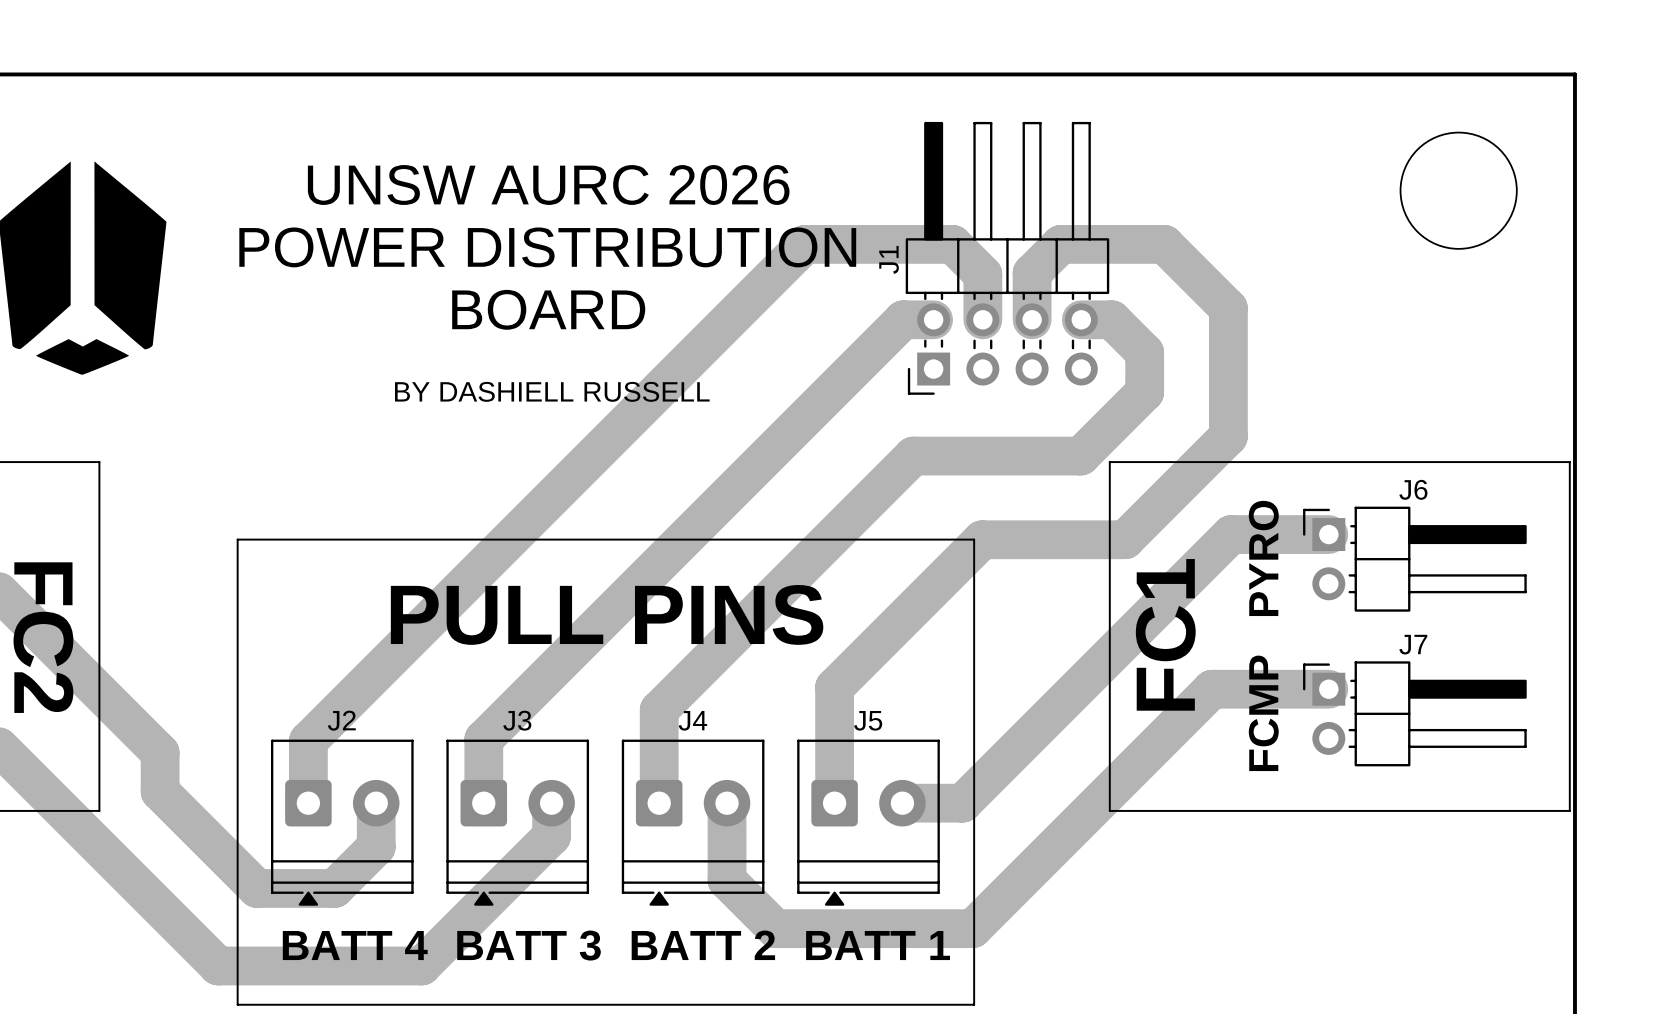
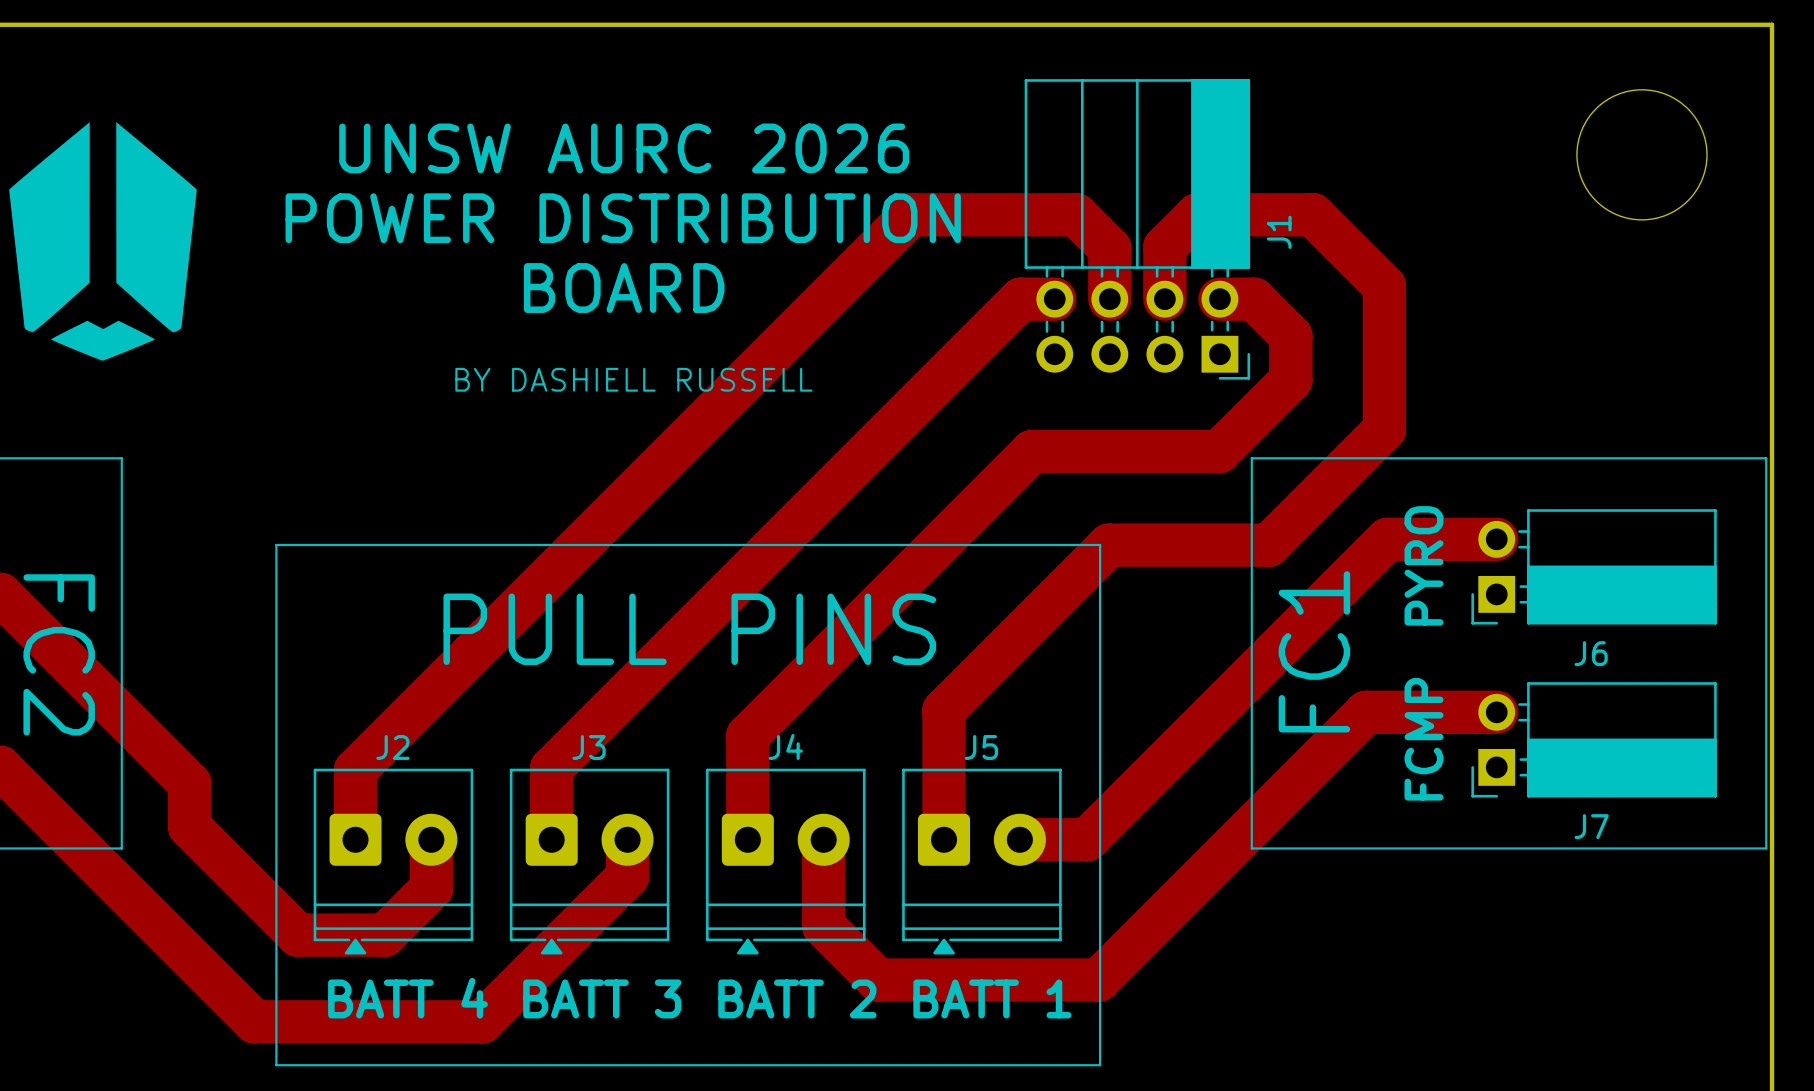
J1 footprint: [905, 121, 1110, 395] -> [1024, 79, 1251, 380]
J1 name position: J1 (889, 259) -> J1 (1279, 232)
J6 name position: J6 (1413, 489) -> J6 (1591, 653)
J6 footprint: [1303, 506, 1527, 612] -> [1471, 509, 1717, 625]
J7 name position: J7 (1413, 644) -> J7 (1591, 826)
J7 footprint: [1303, 661, 1527, 767] -> [1471, 682, 1717, 798]

